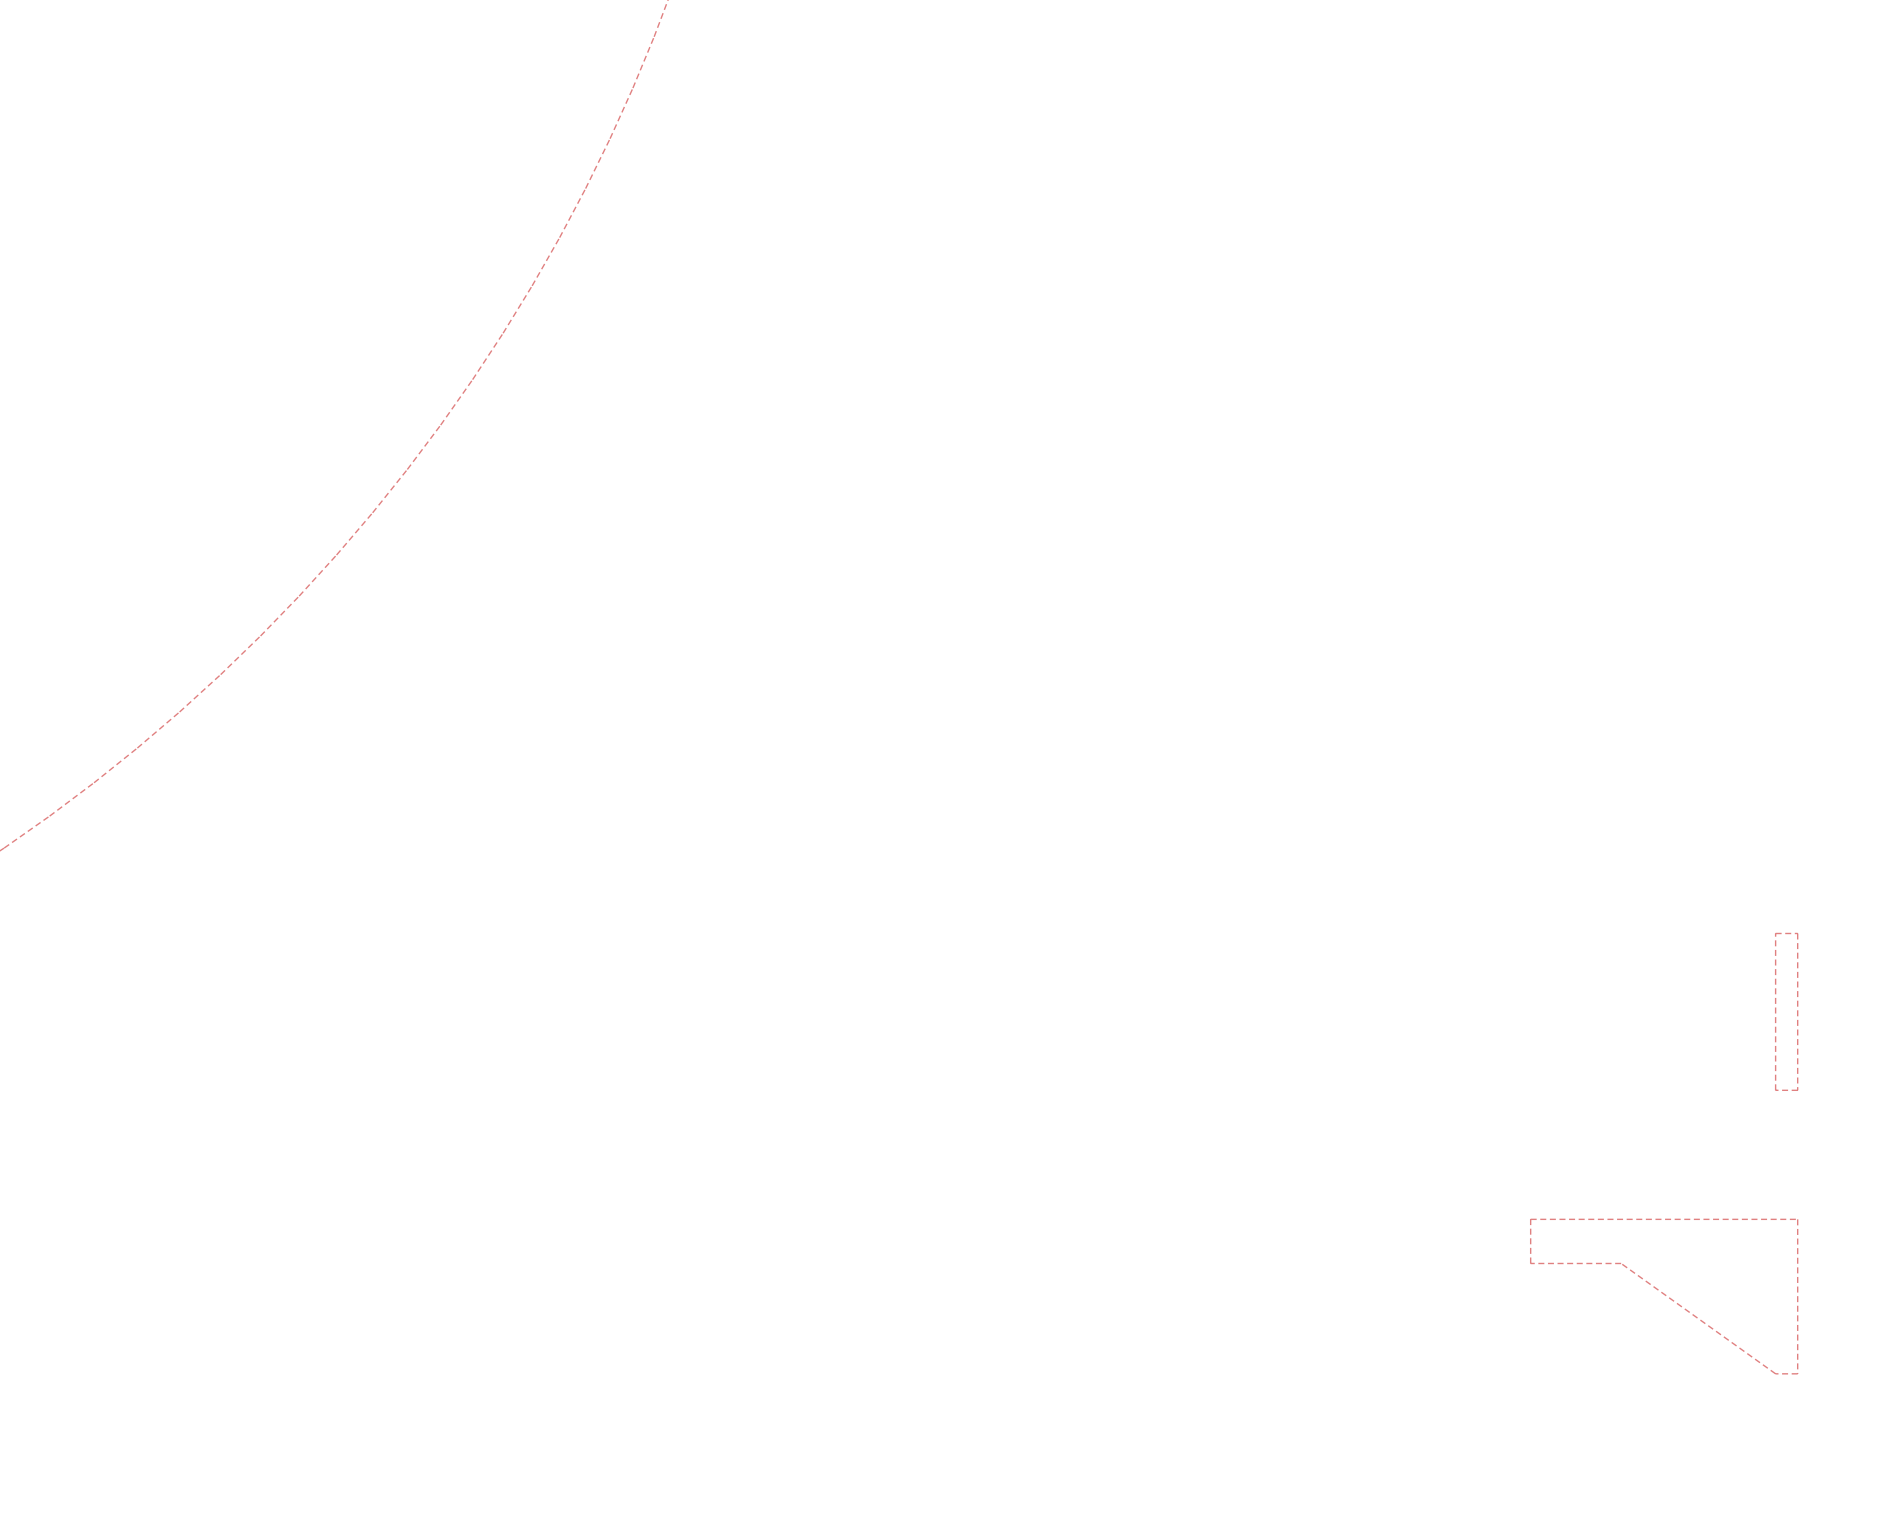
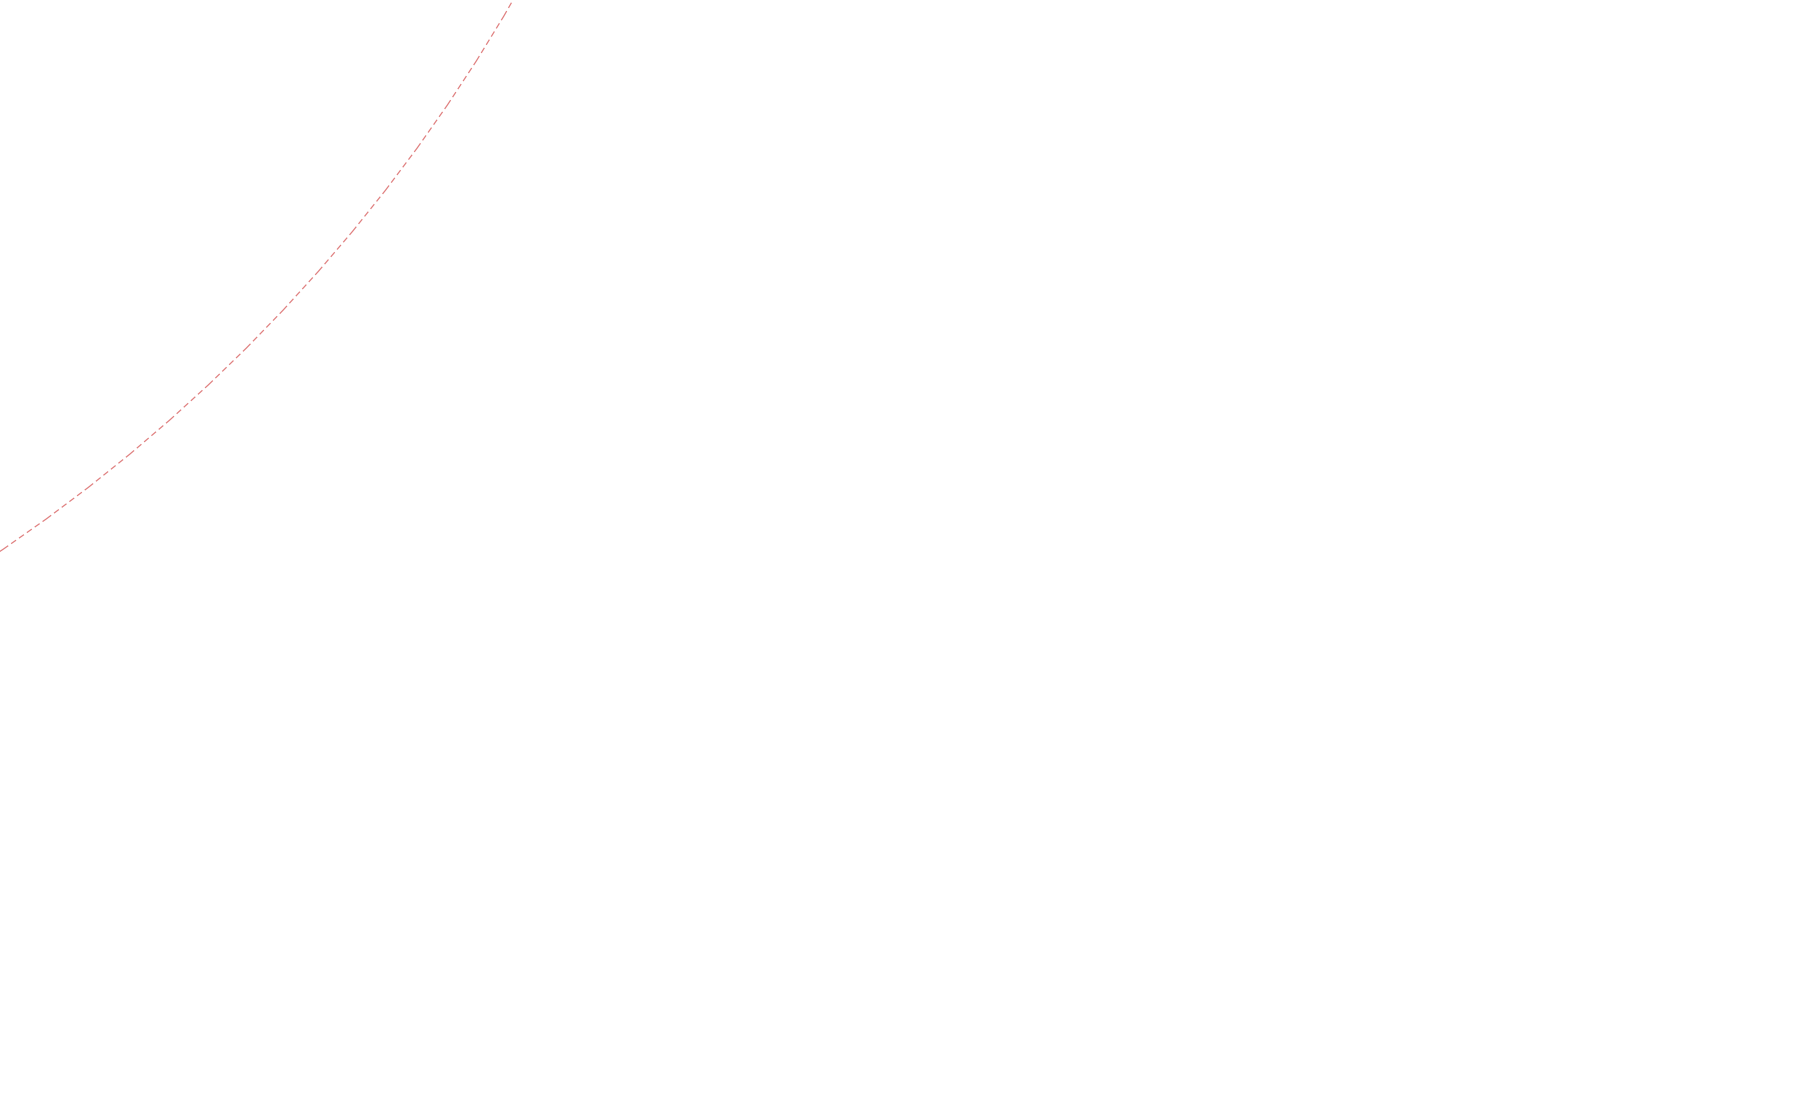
zone outline: (1775, 933) (1775, 1090) (1797, 1090) (1797, 933) (1775, 933) -> none
zone outline: (1530, 1219) (1530, 1263) (1621, 1263) (1775, 1373) (1797, 1373) (1797, 1219) (1530, 1219) -> none

